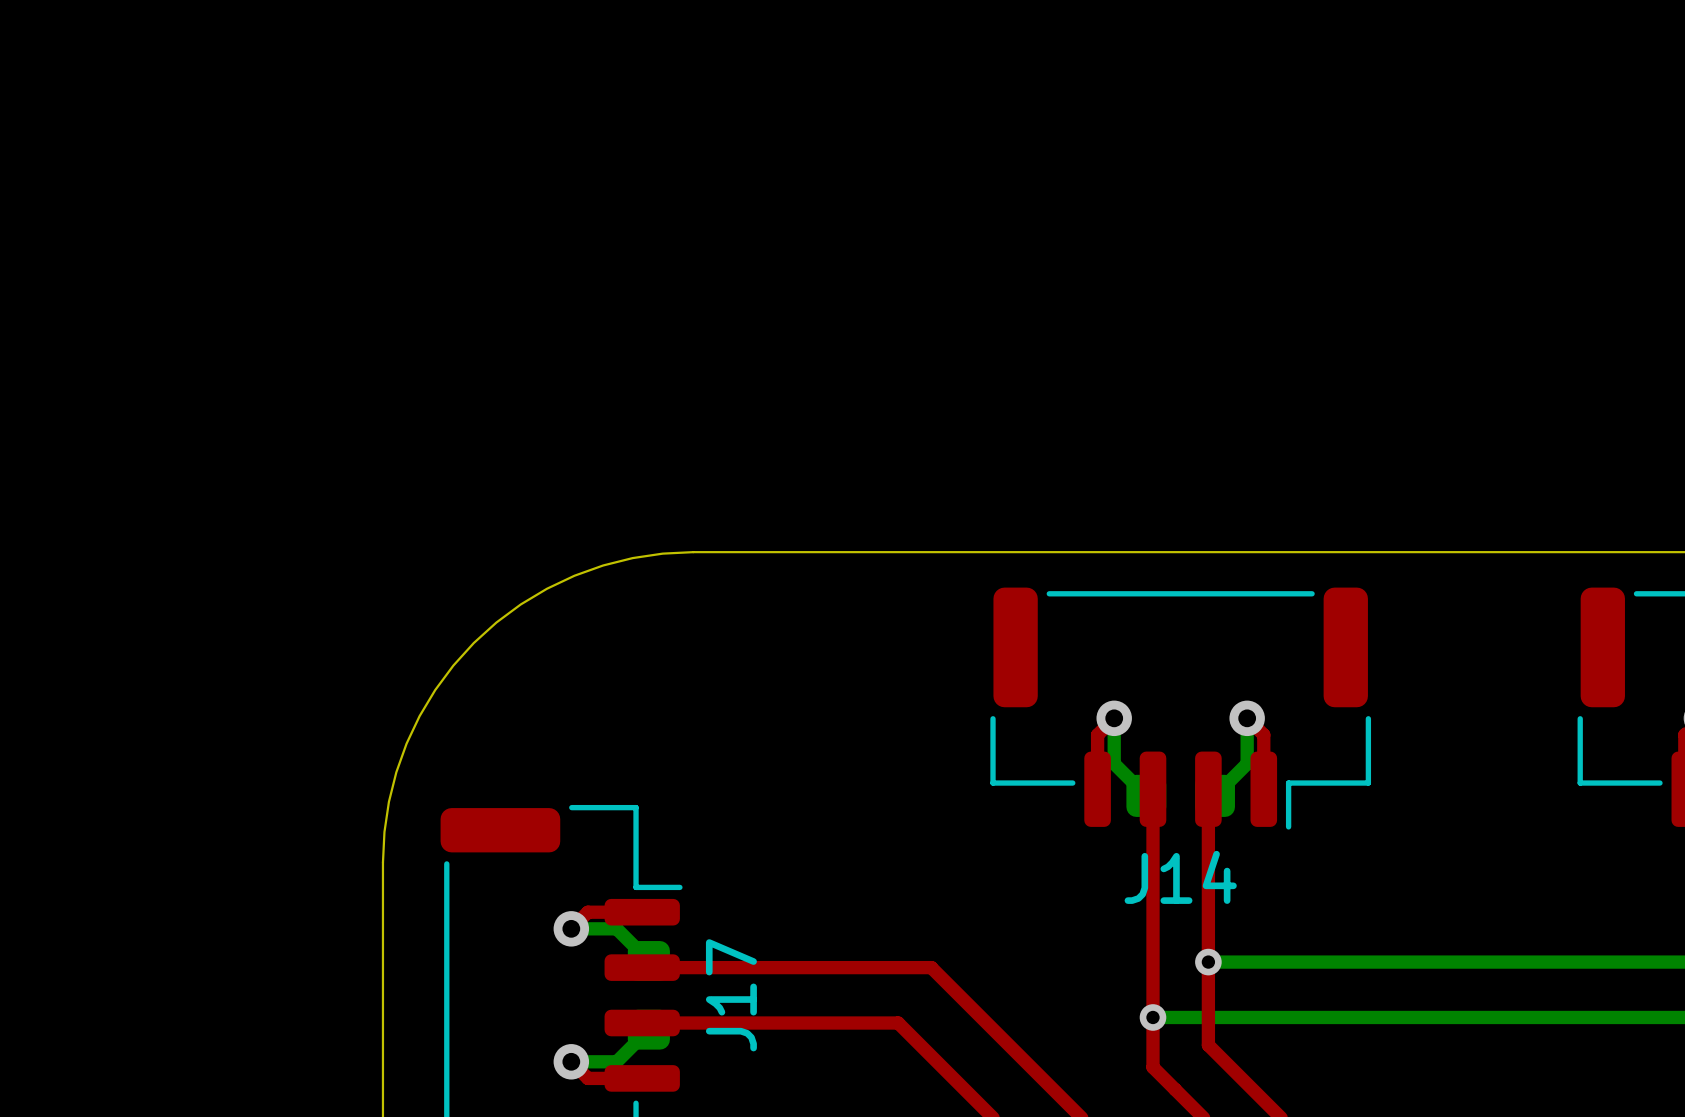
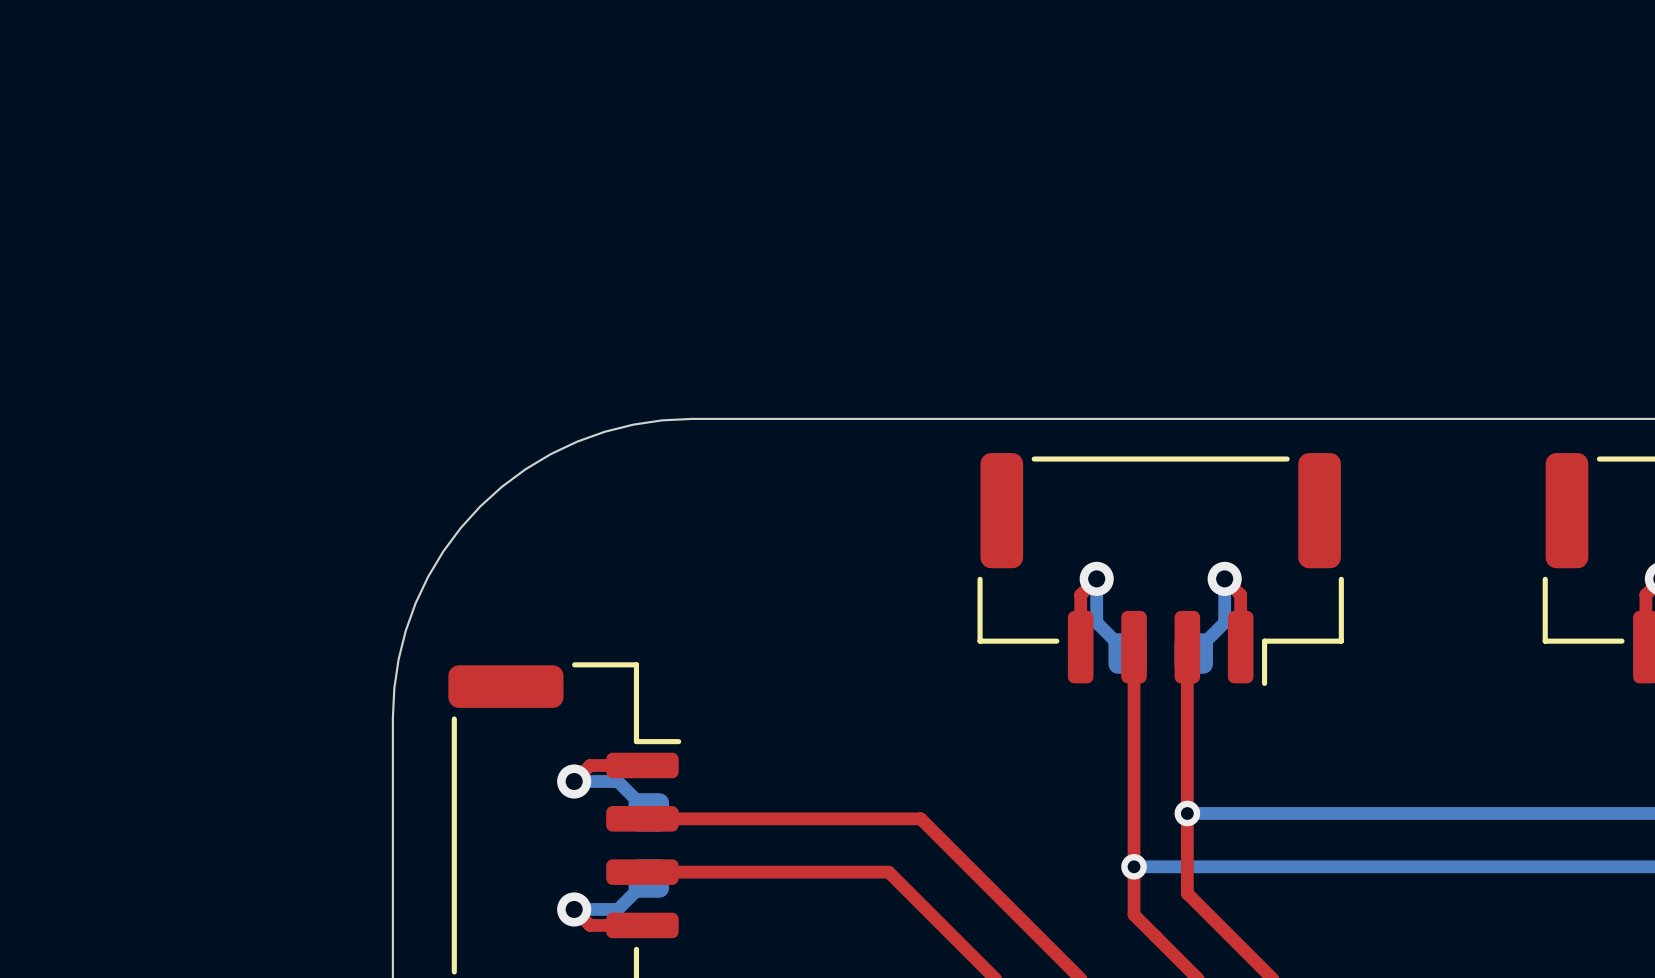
J14 name: J14 (1180, 877) -> none
J17 name: J17 (731, 995) -> none

